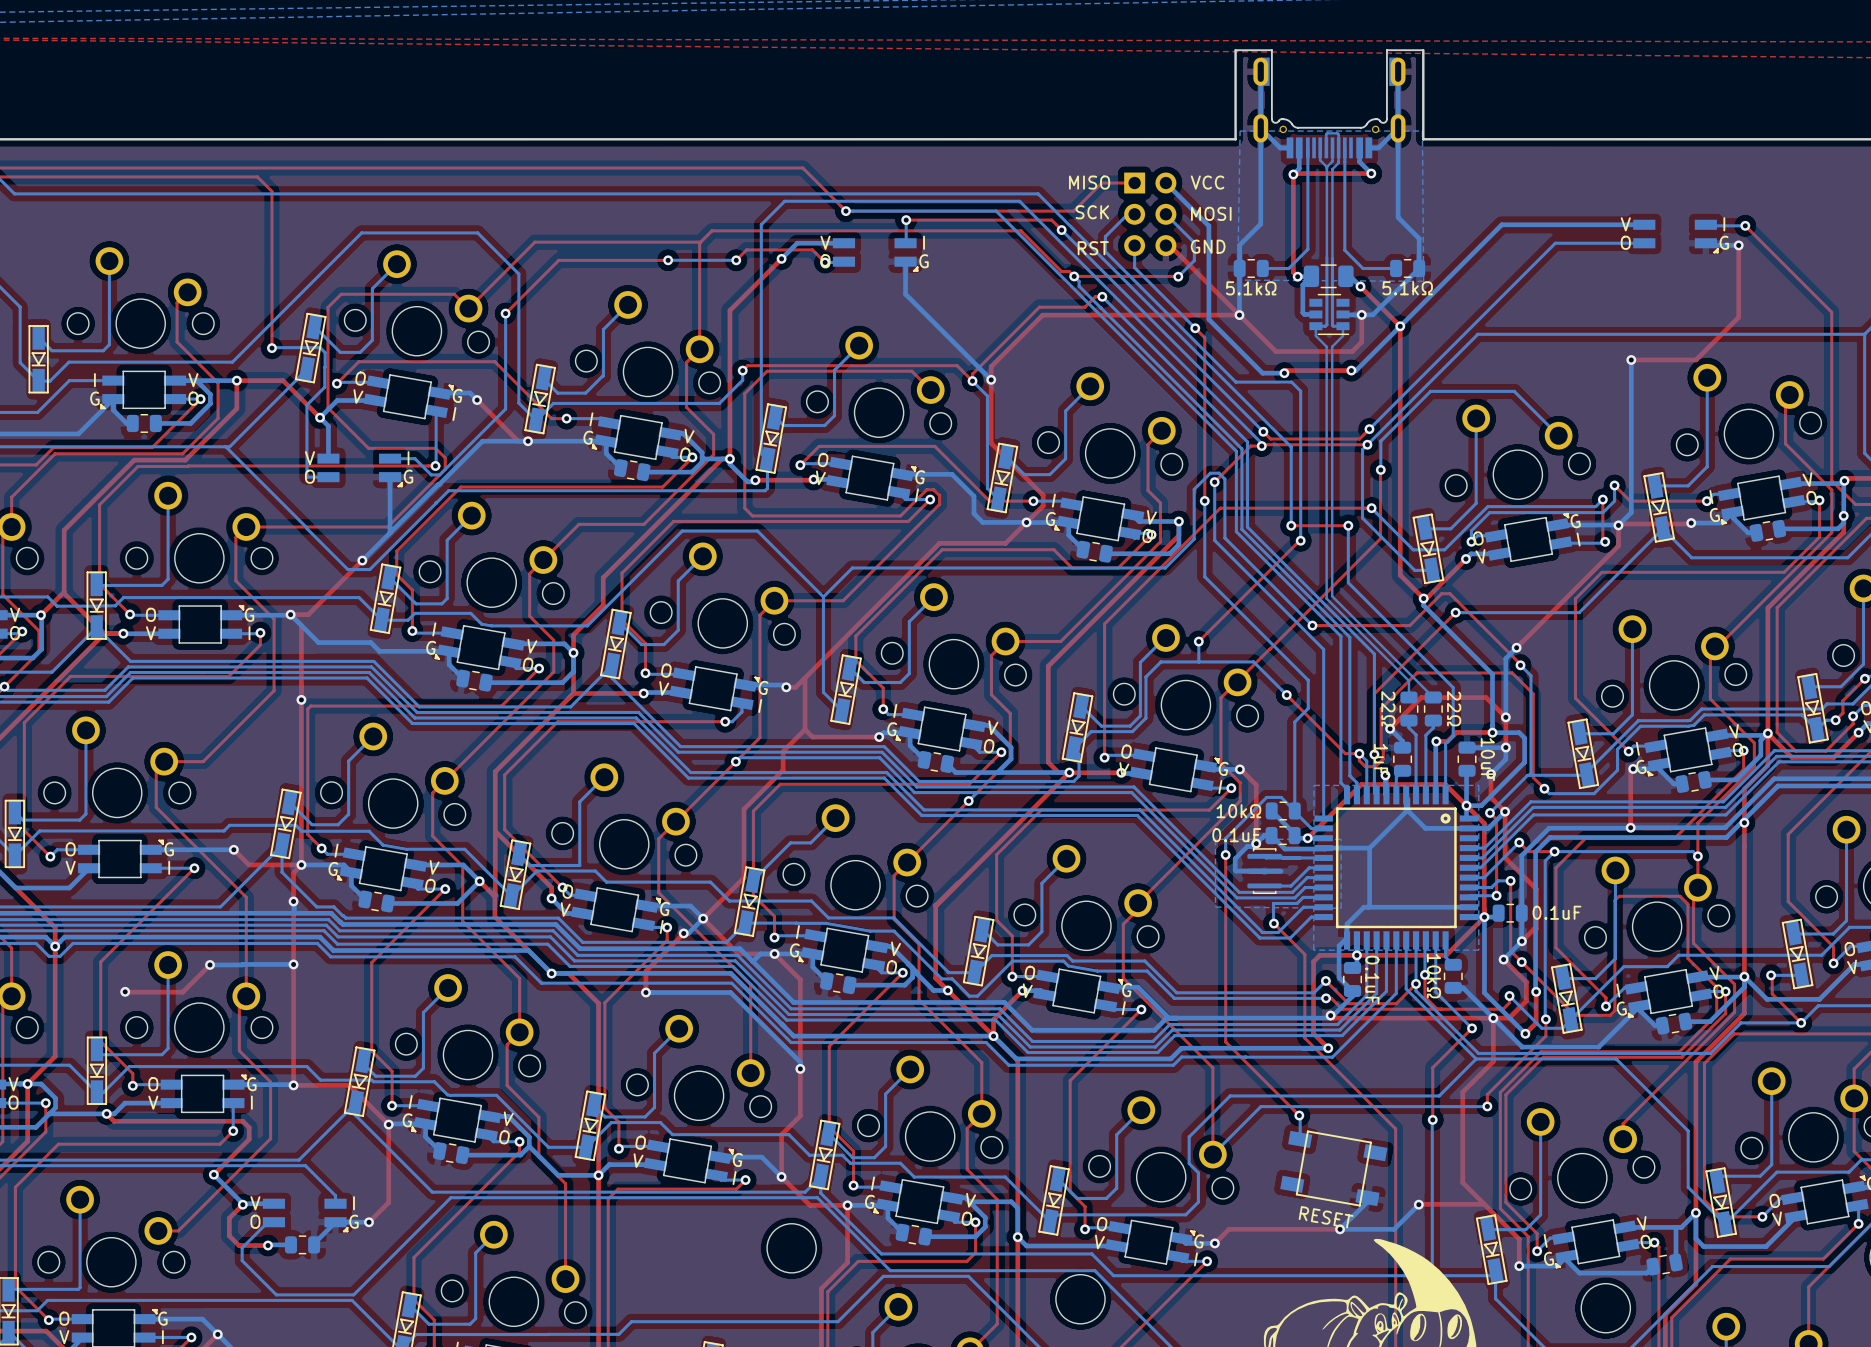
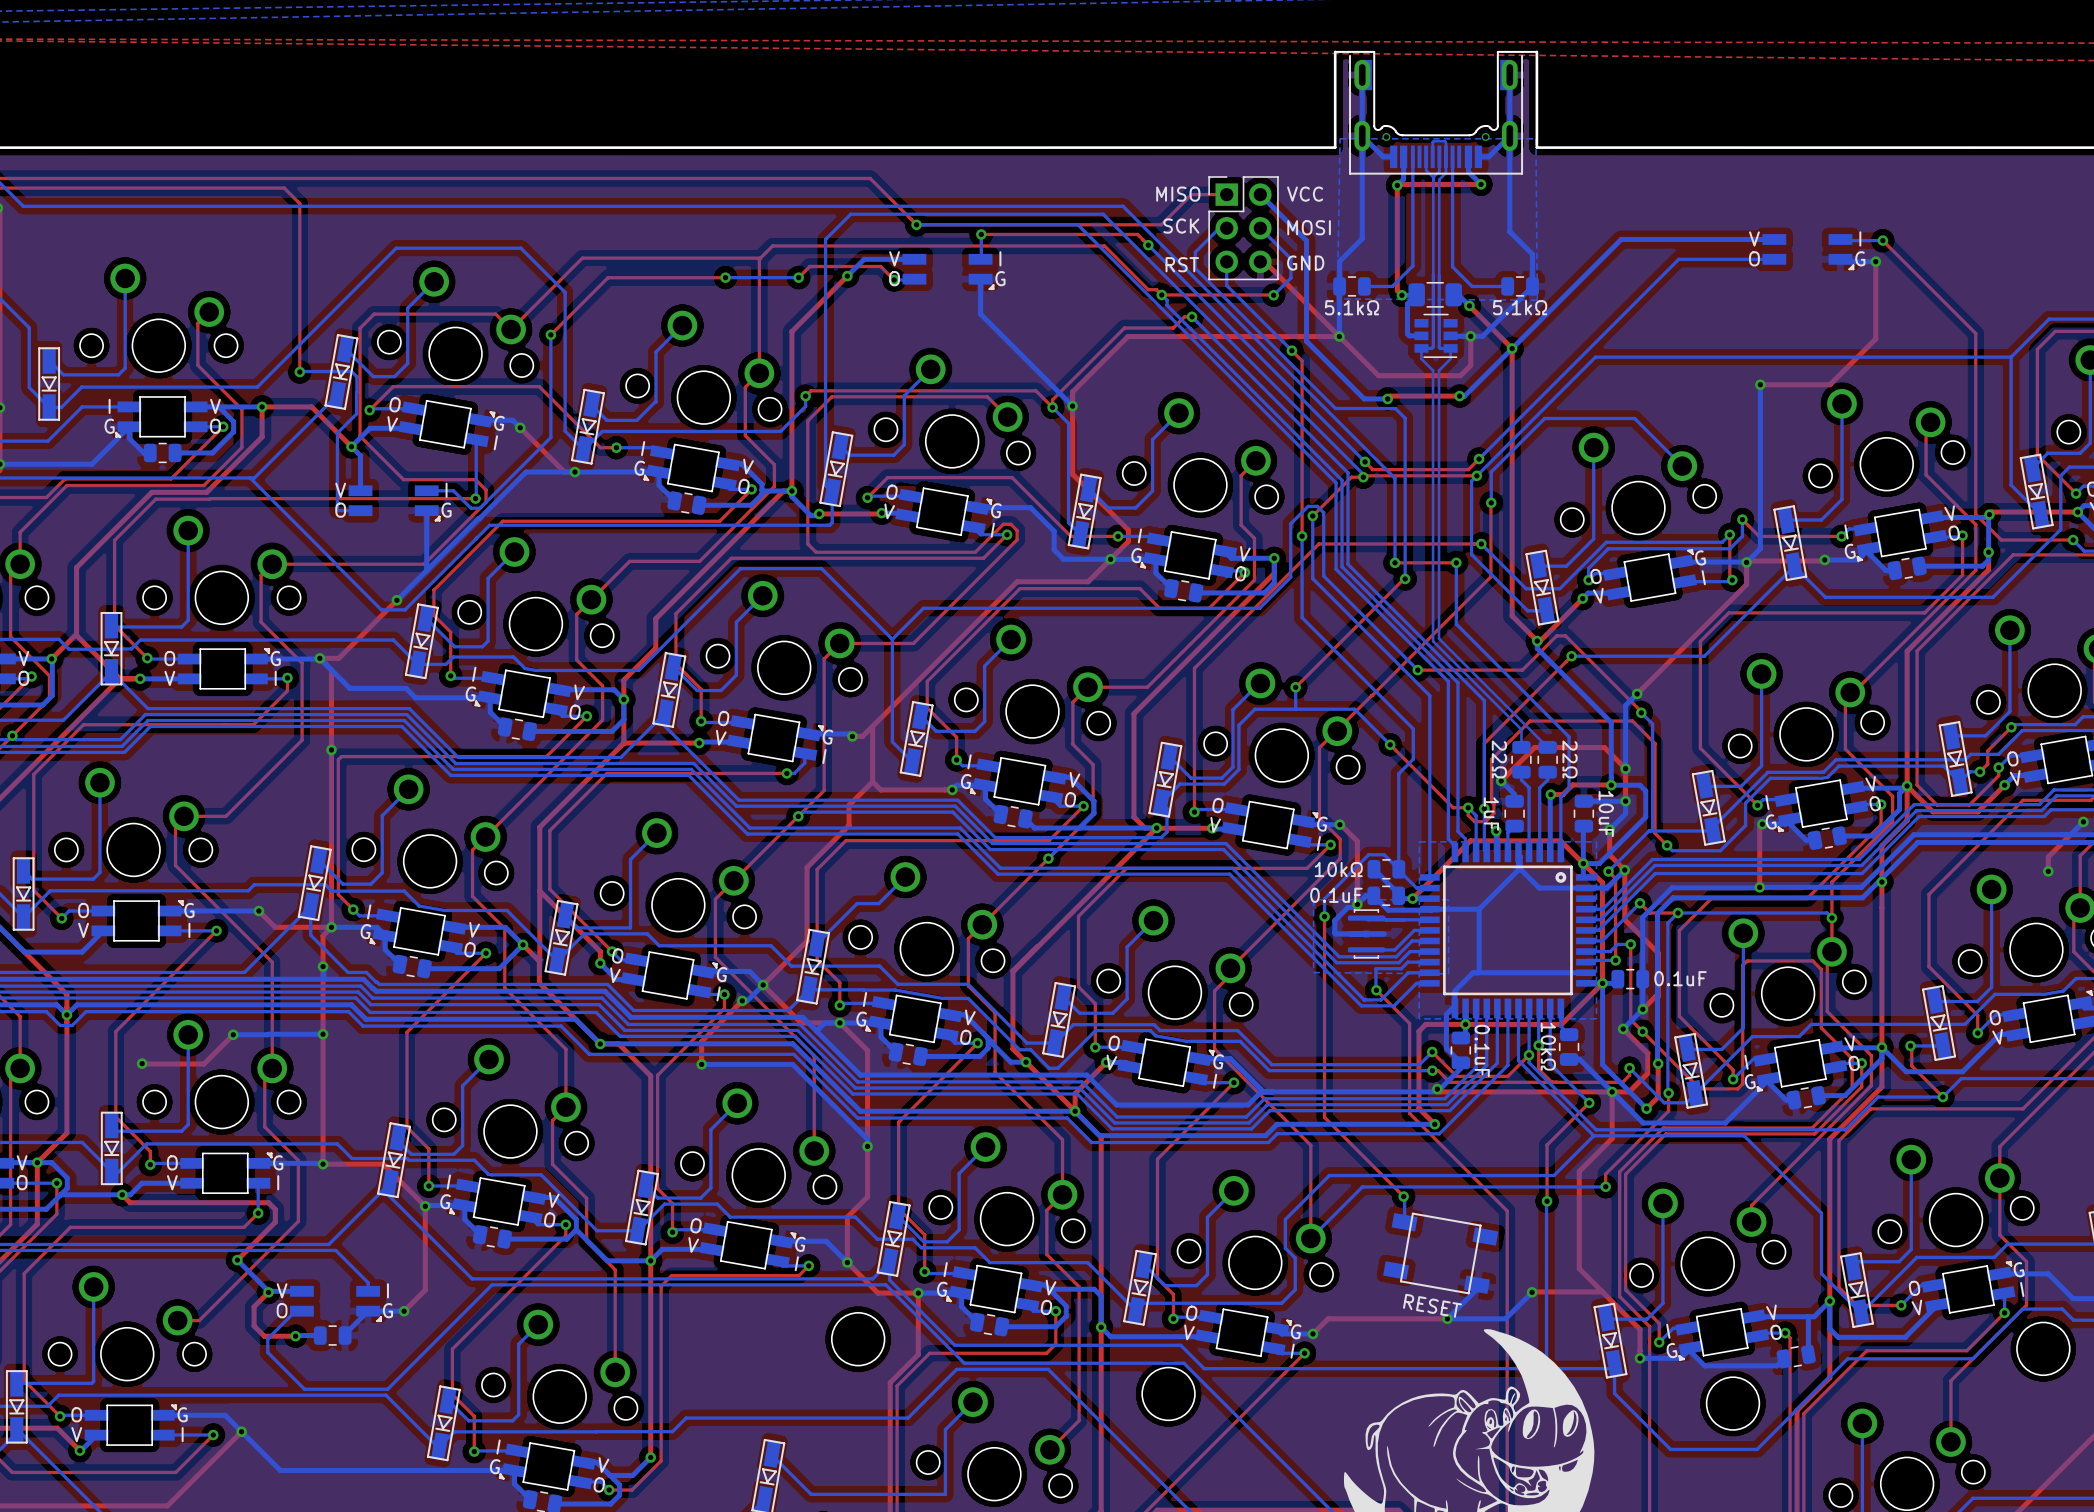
part footprint: [1234, 49, 1425, 159] -> [1334, 50, 1538, 175]
part footprint: [1124, 172, 1177, 257] -> [1208, 176, 1279, 281]

